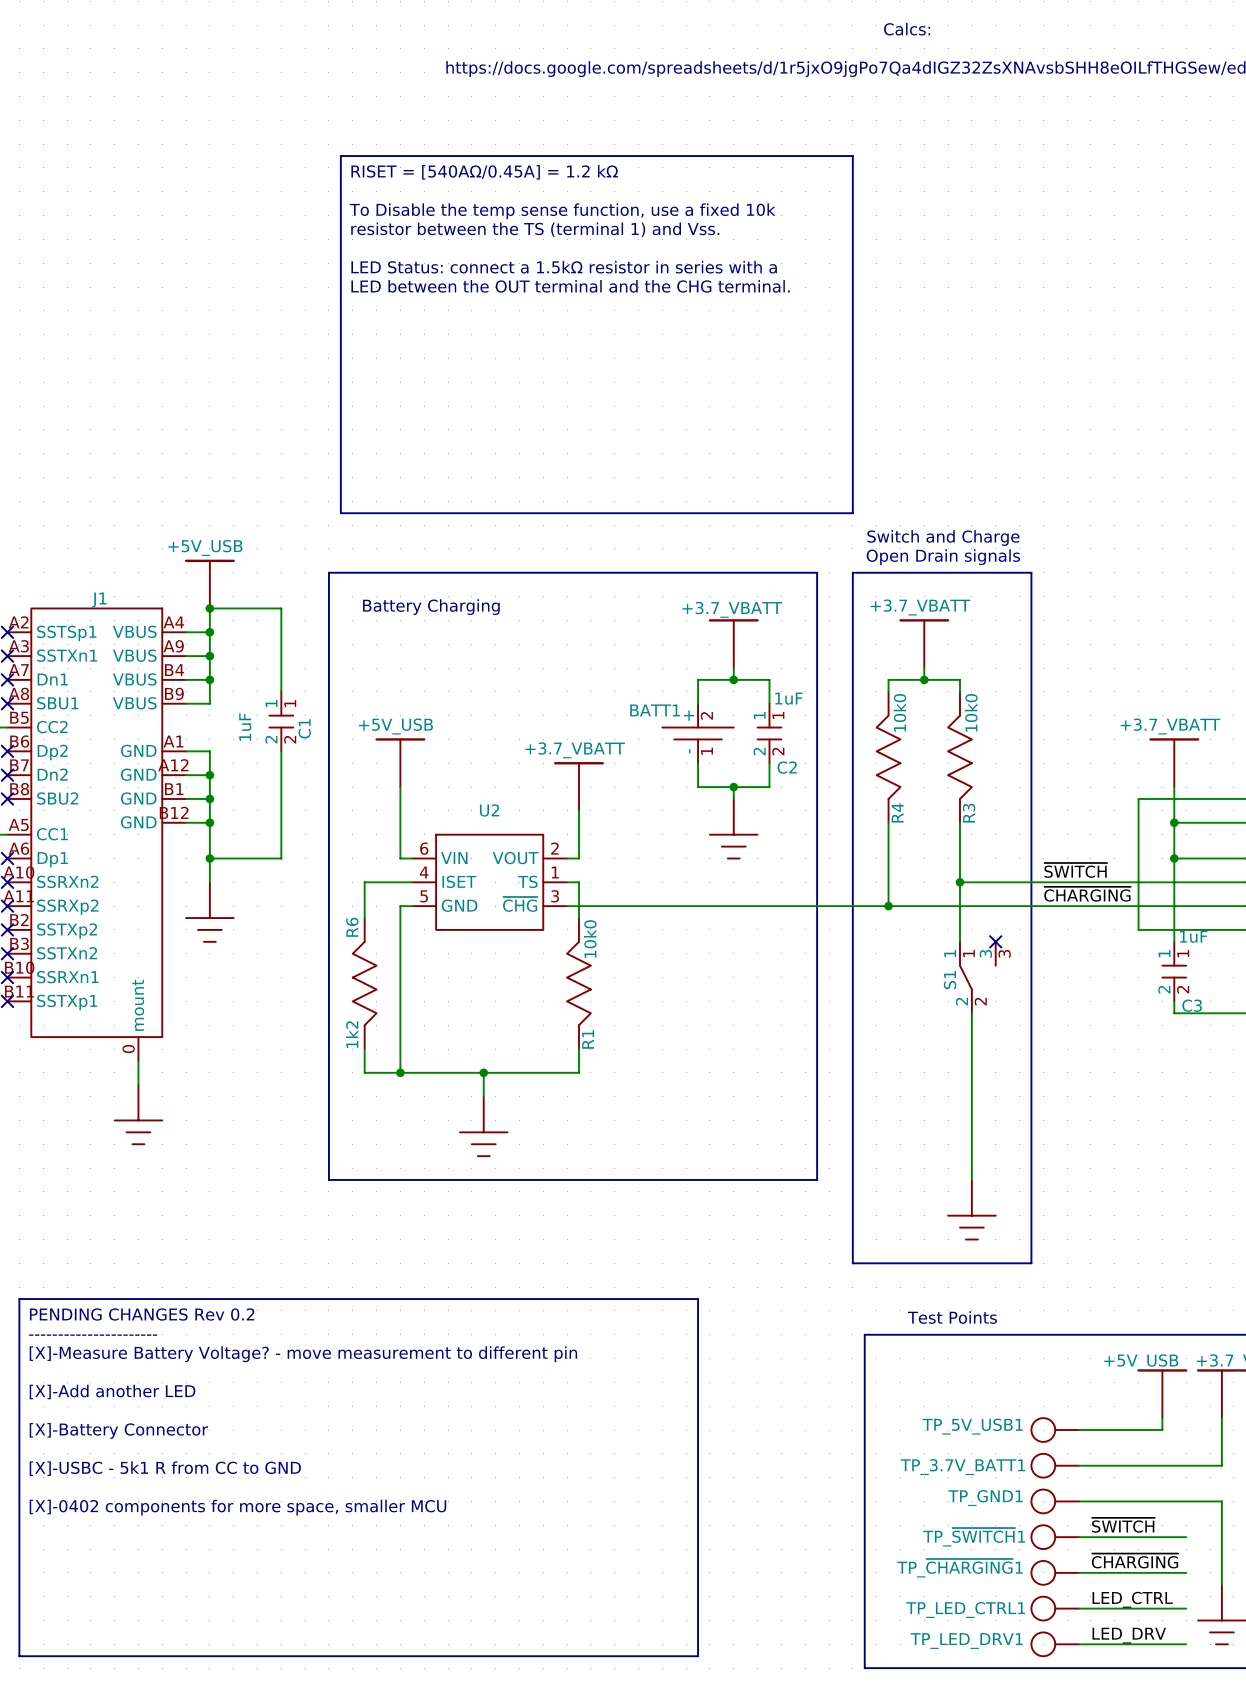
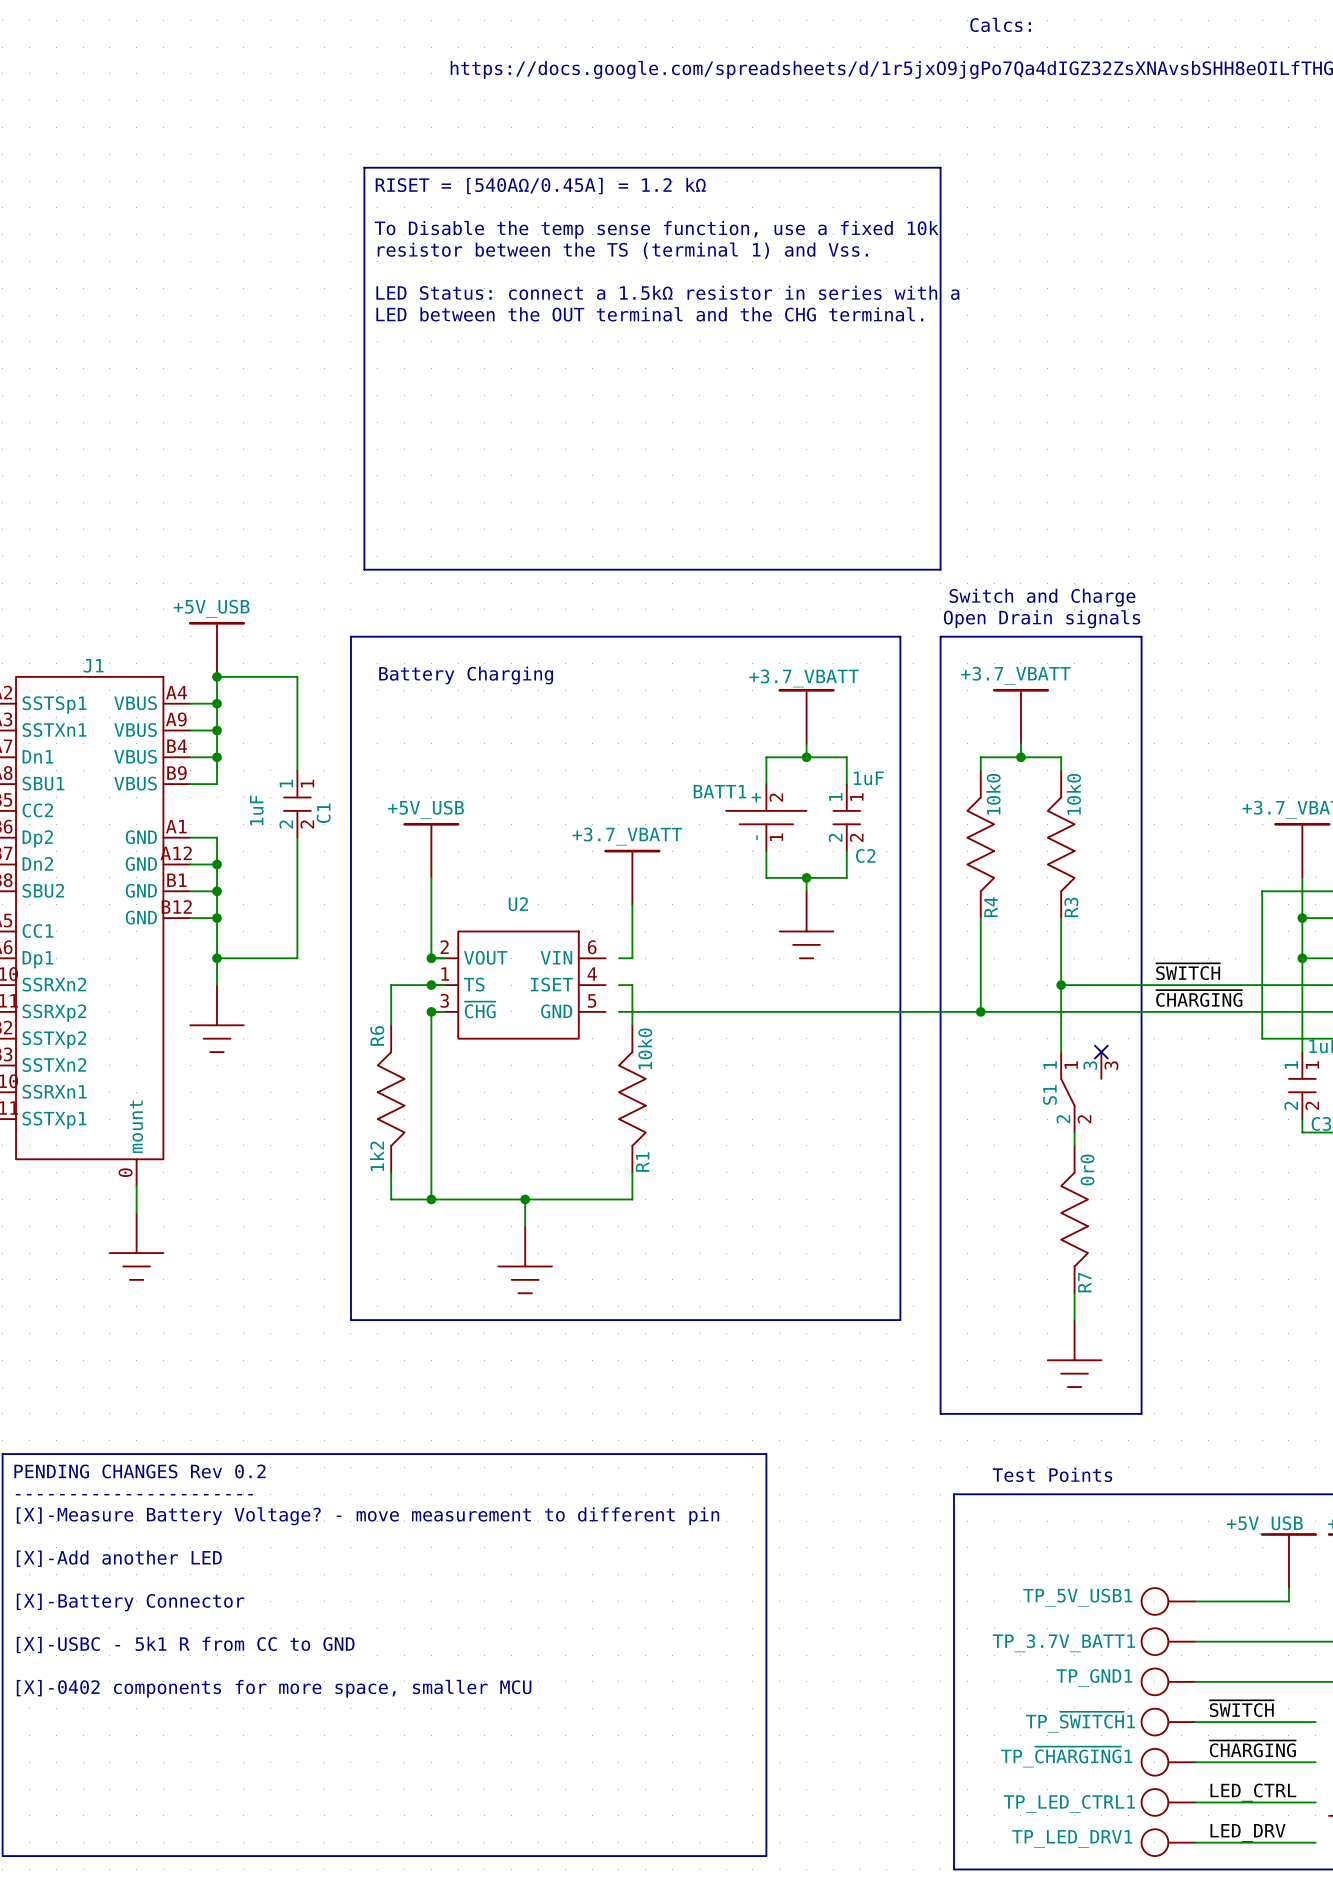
junction: none -> (431, 958)
junction: none -> (431, 985)
U2 flip: as is (489, 882) -> left-right (518, 985)
junction: none -> (431, 1011)
wire: (971, 1025) (971, 1156) -> none
R7: none -> 0r0 (1074, 1219)

